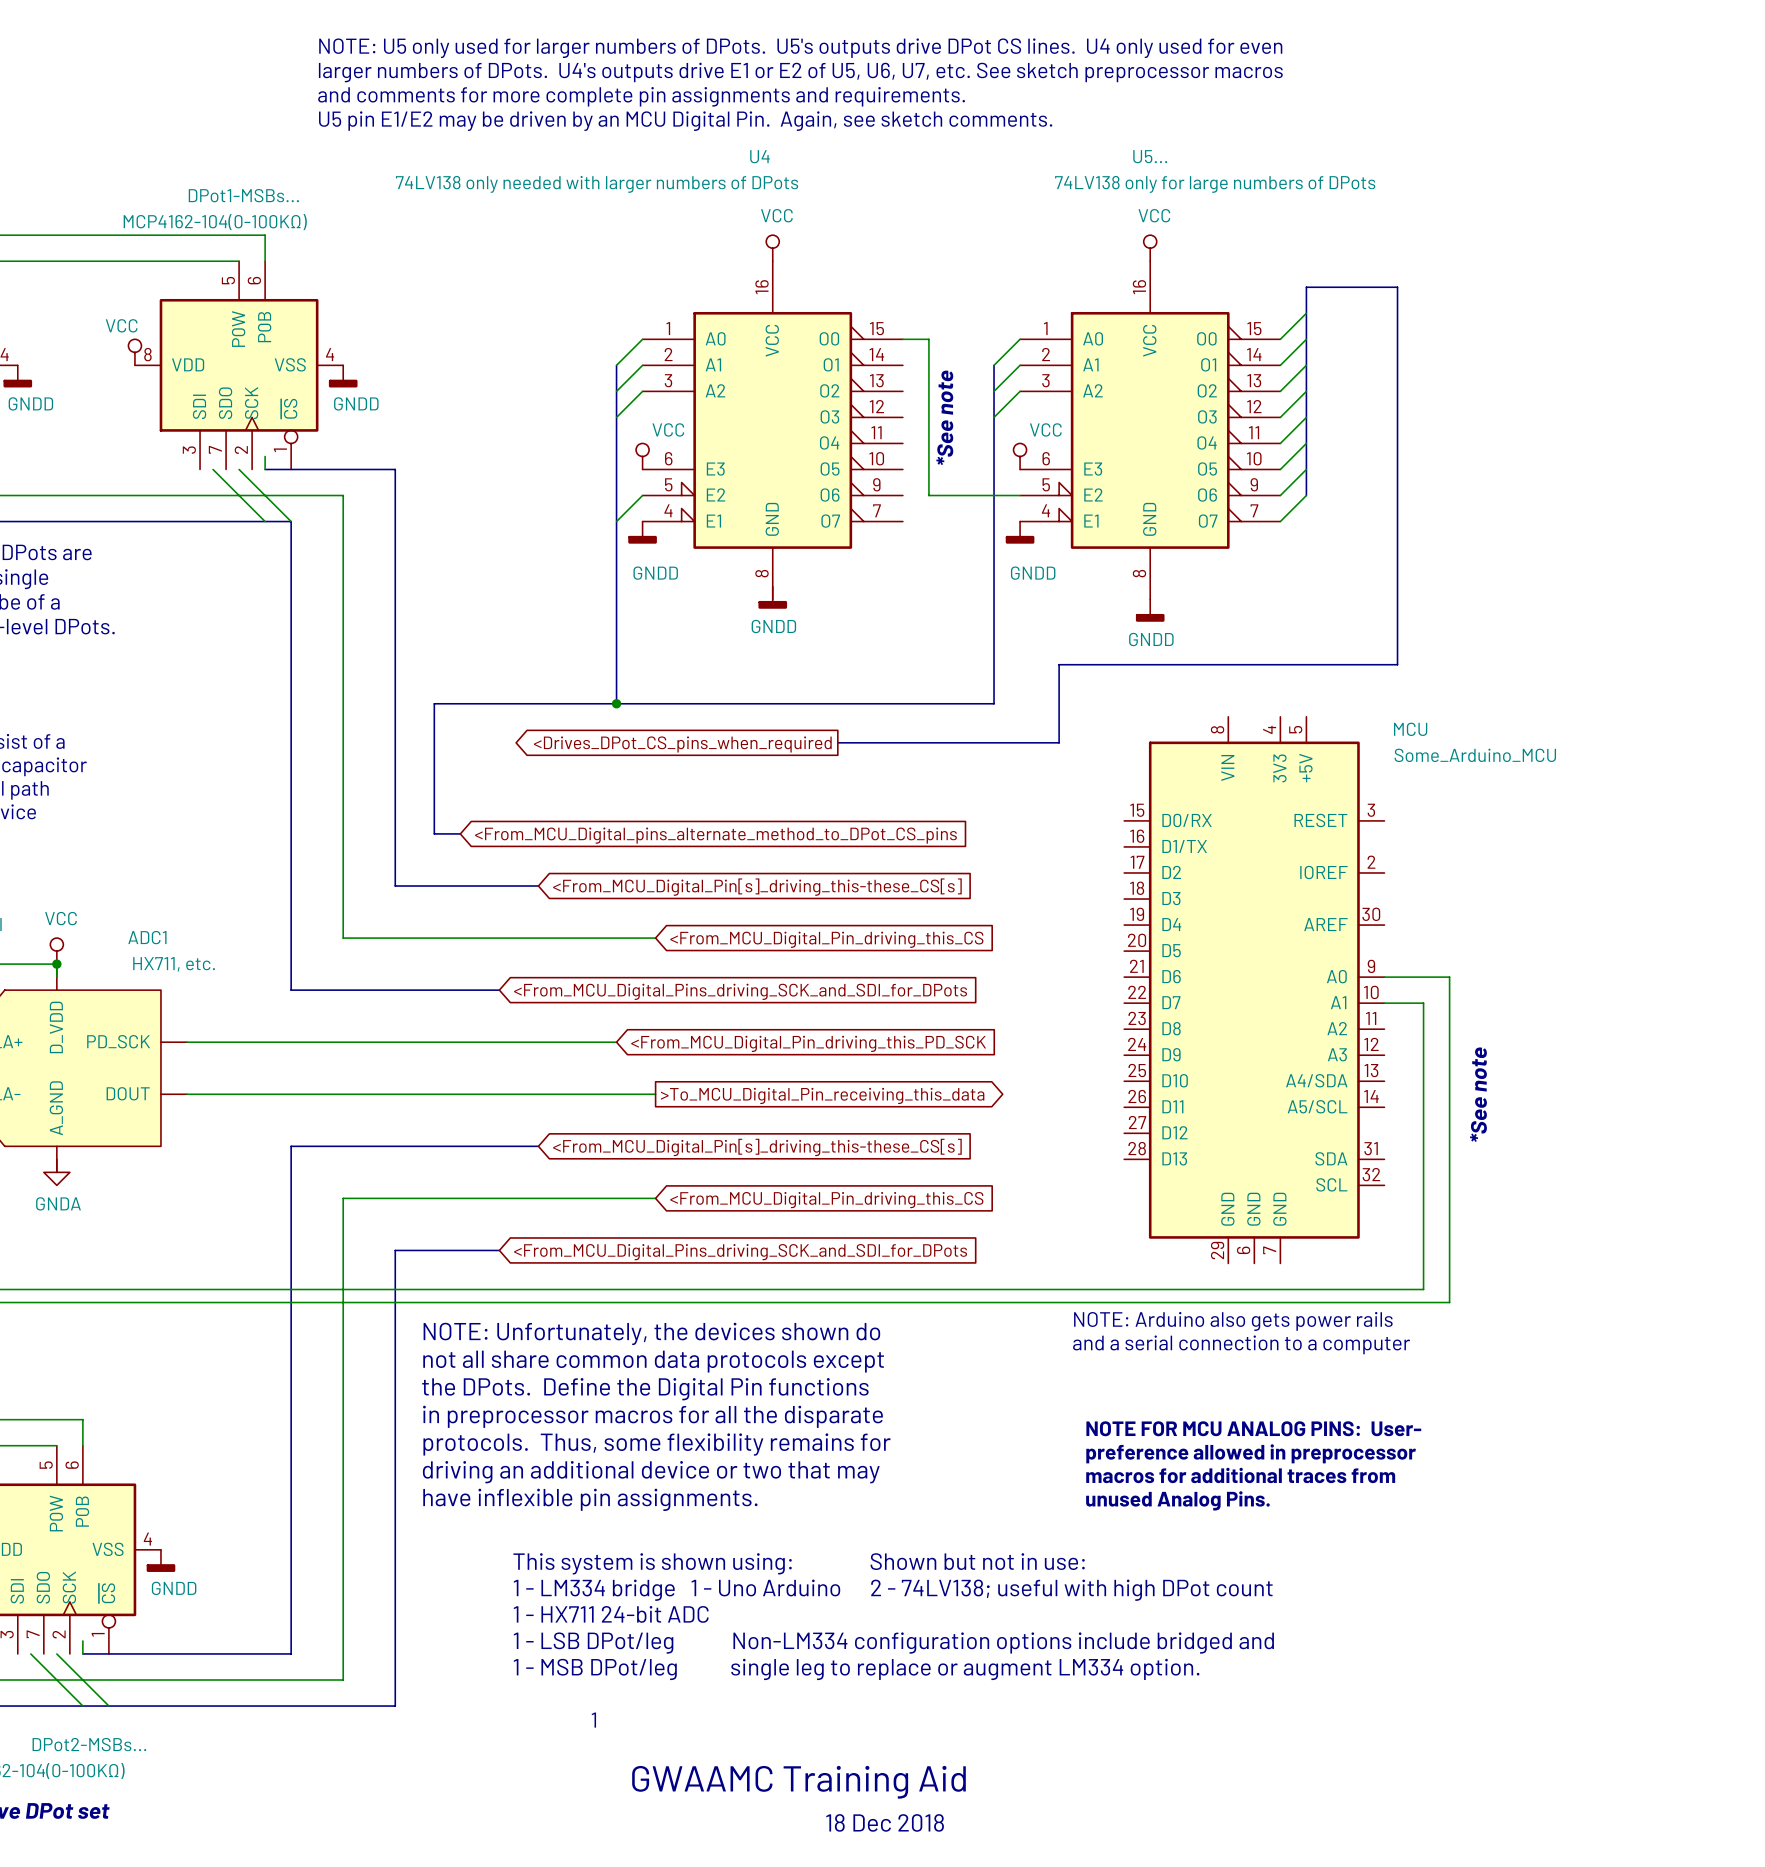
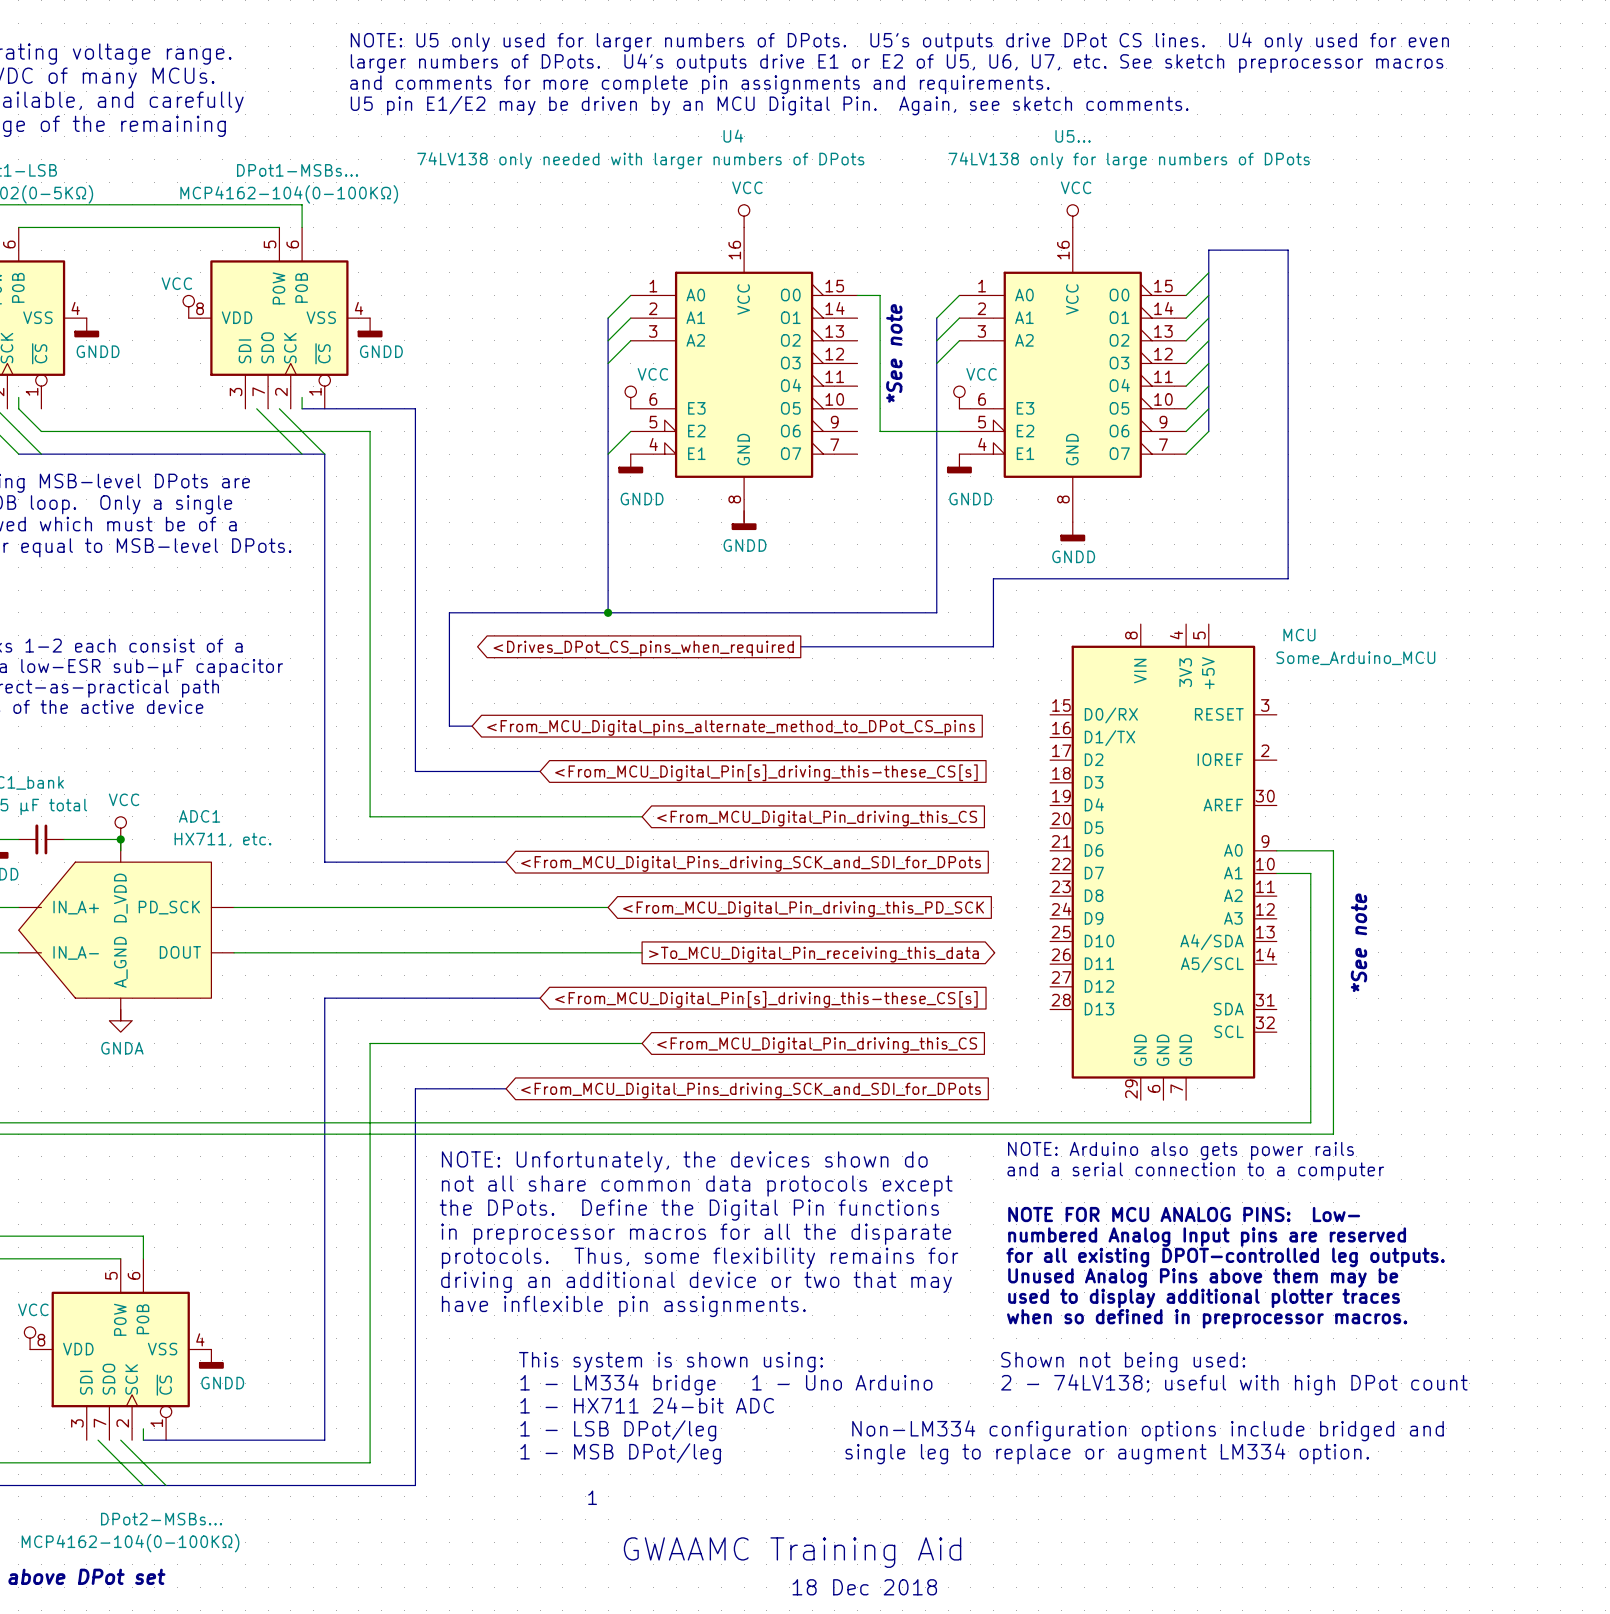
text: none -> NOTE FOR MCU ANALOG PINS: Low- (1184, 1214)
text: none -> numbered Analog Input pins are reserved (1207, 1237)
text: NOTE FOR MCU ANALOG PINS: User- (1253, 1428) -> none
text: none -> for all existing DPOT-controlled leg outputs. (1225, 1257)
text: preference allowed in preprocessor (1251, 1453) -> none
text: none -> Unused Analog Pins above them may be (1203, 1277)
text: macros for additional traces from (1240, 1475) -> none
text: none -> used to display additional plotter traces (1204, 1298)
text: unused Analog Pins. (1177, 1500) -> none
text: none -> when so defined in preprocessor macros. (1207, 1318)
text: This system is shown using: Shown but not in use: (799, 1563) -> This system is shown using: Shown not being used: (882, 1362)

